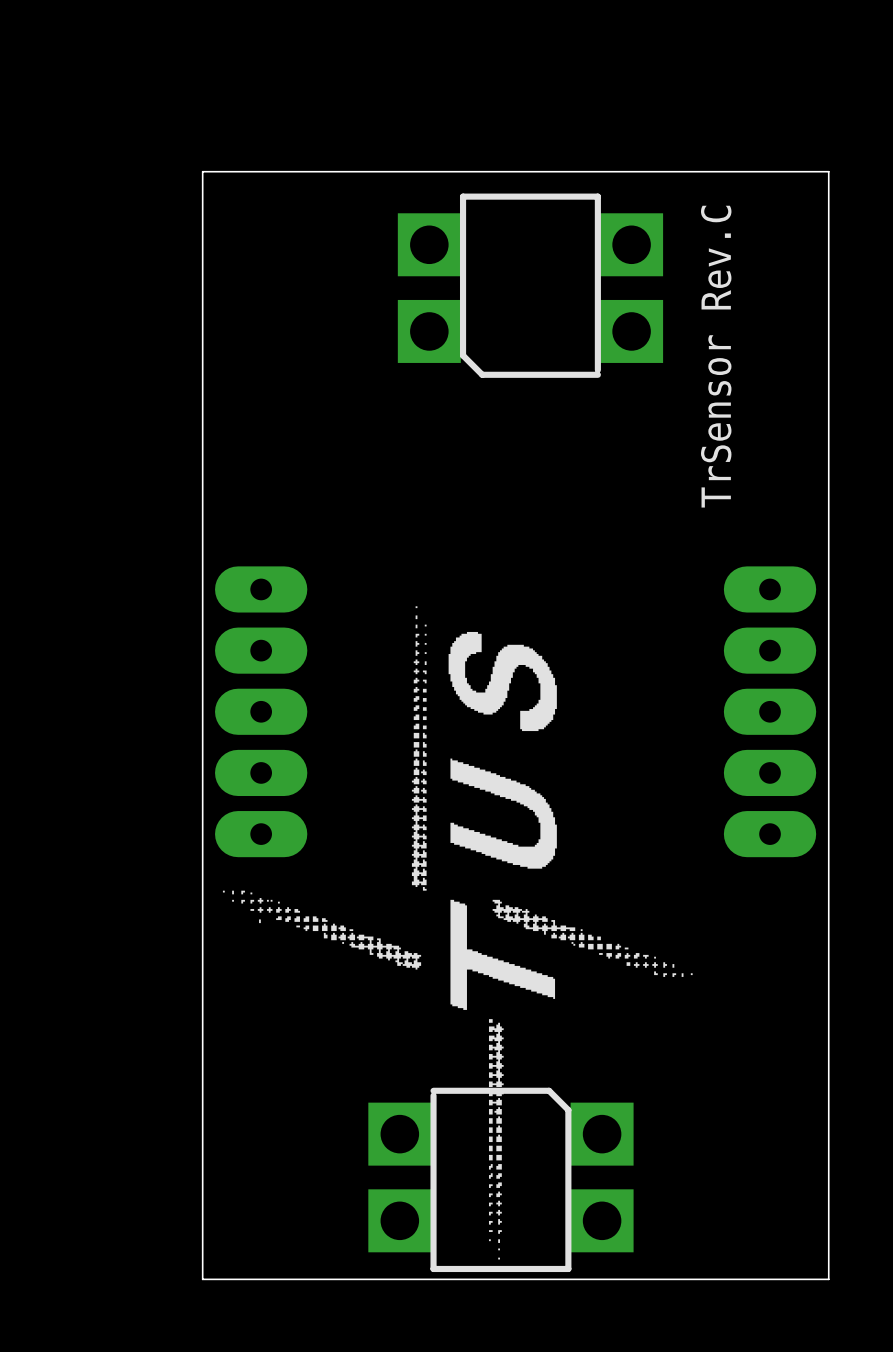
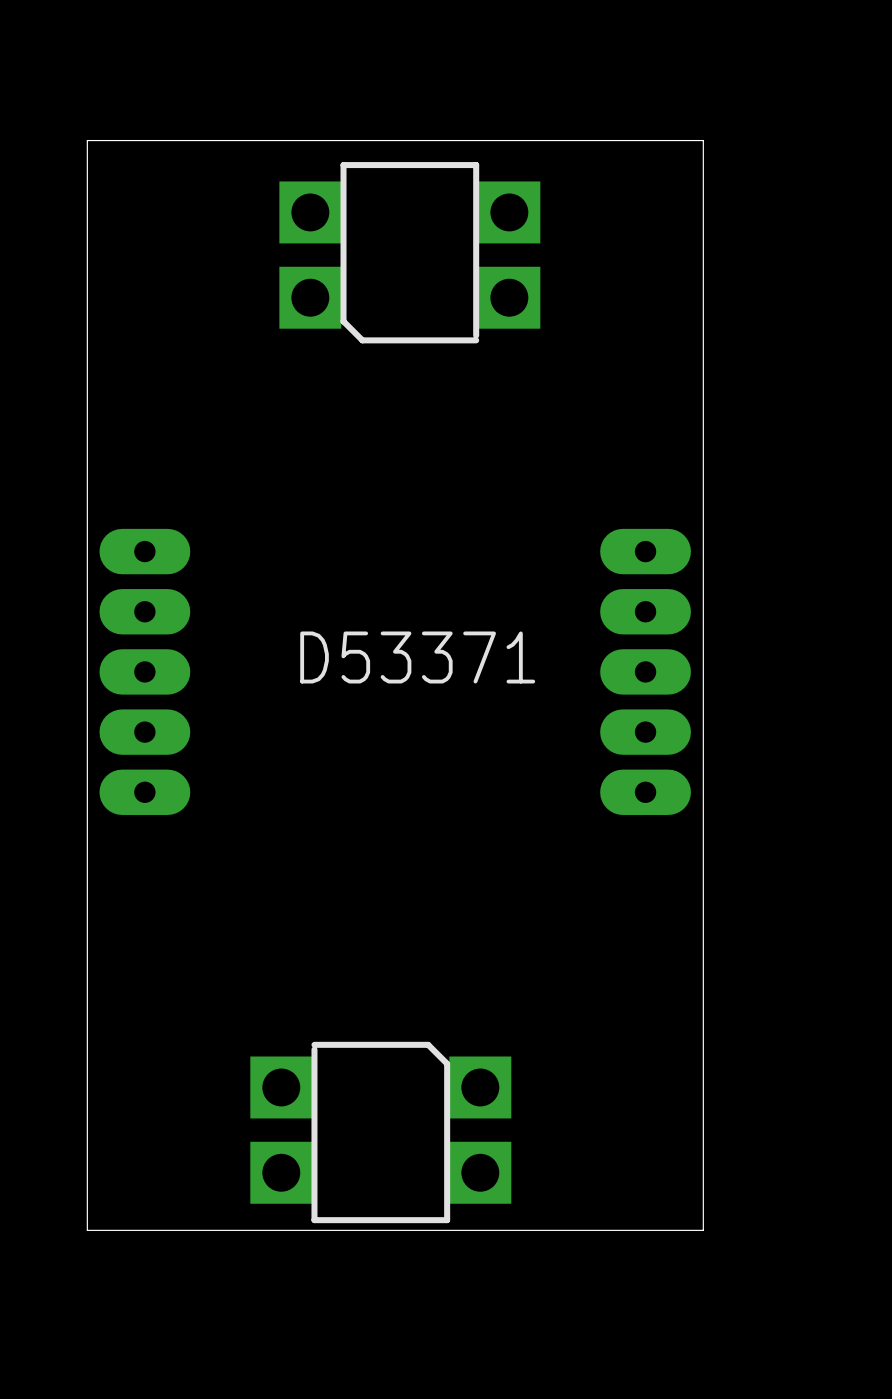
text: TrSensor Rev.C (716, 356) -> none
drawing: [222, 606, 693, 1260] -> none
text: none -> D53371 (417, 657)

